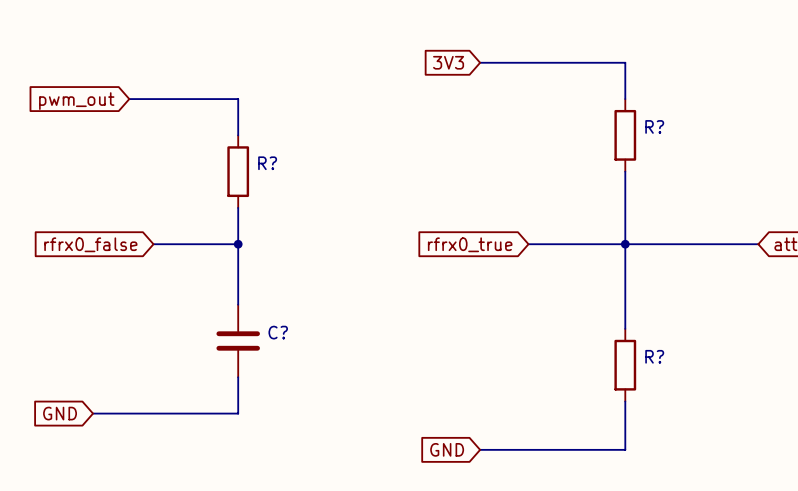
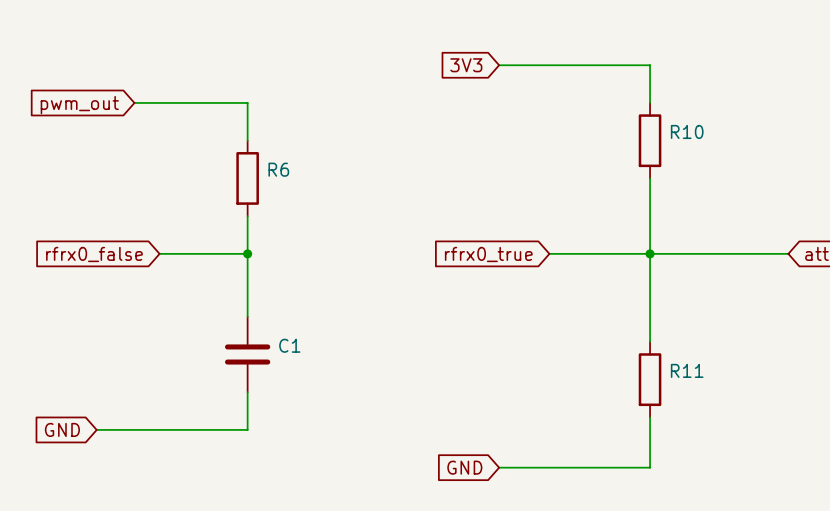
R? name: R? (654, 126) -> R10 (687, 131)
R? name: R? (267, 163) -> R6 (278, 169)
C? name: C? (278, 332) -> C1 (289, 345)
R? name: R? (654, 356) -> R11 (687, 370)

